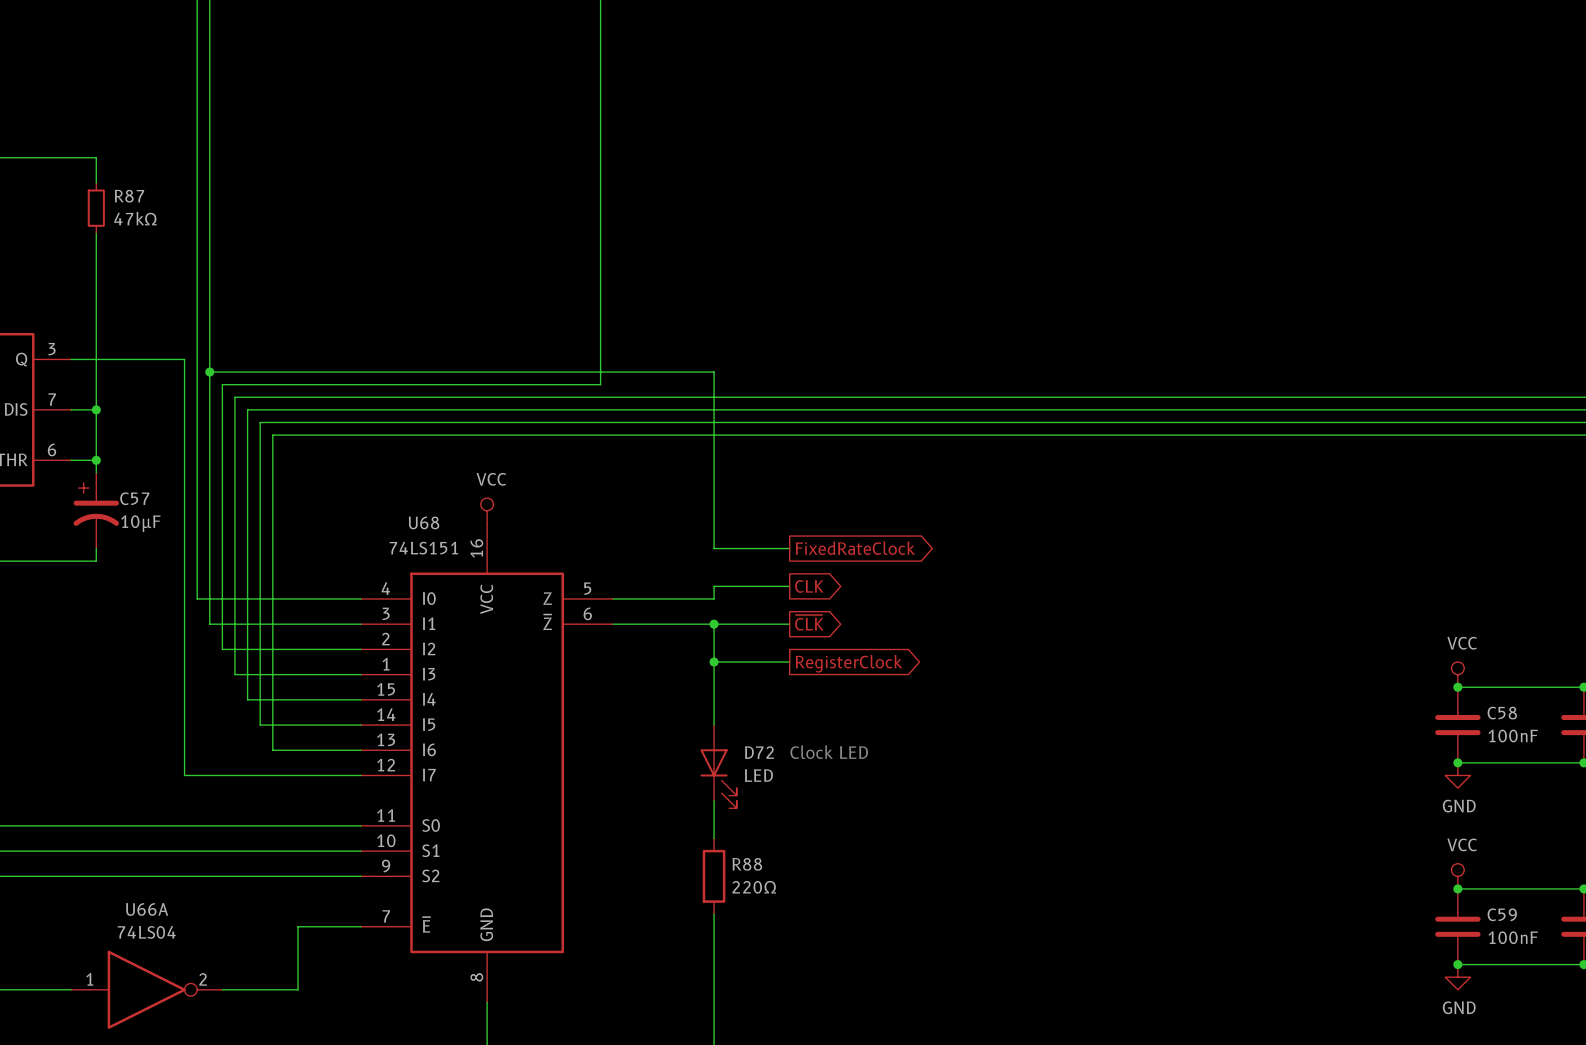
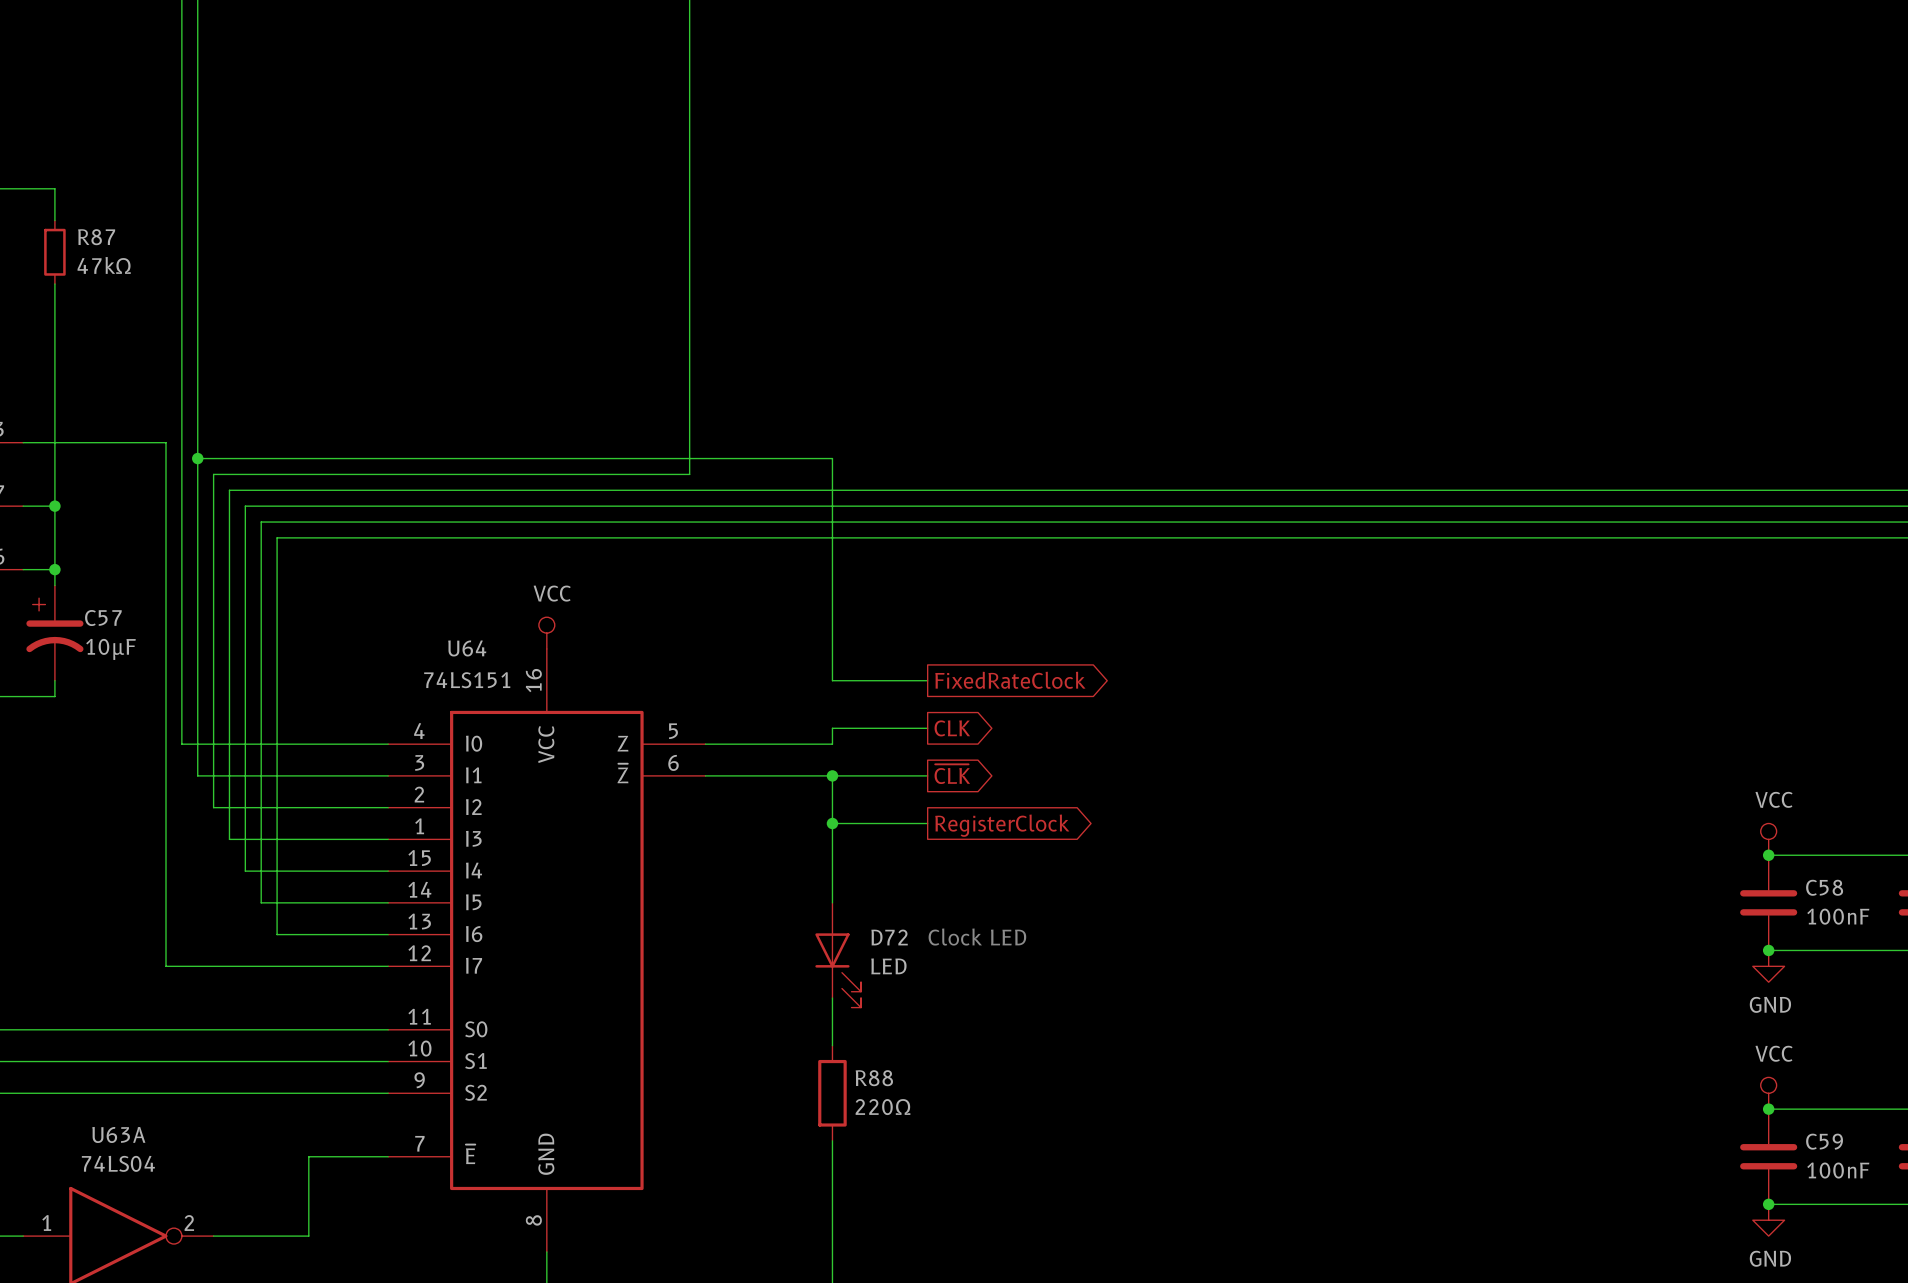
U68 name: U68 (424, 522) -> U64 (467, 648)
U66A name: U66A (147, 909) -> U63A (118, 1134)

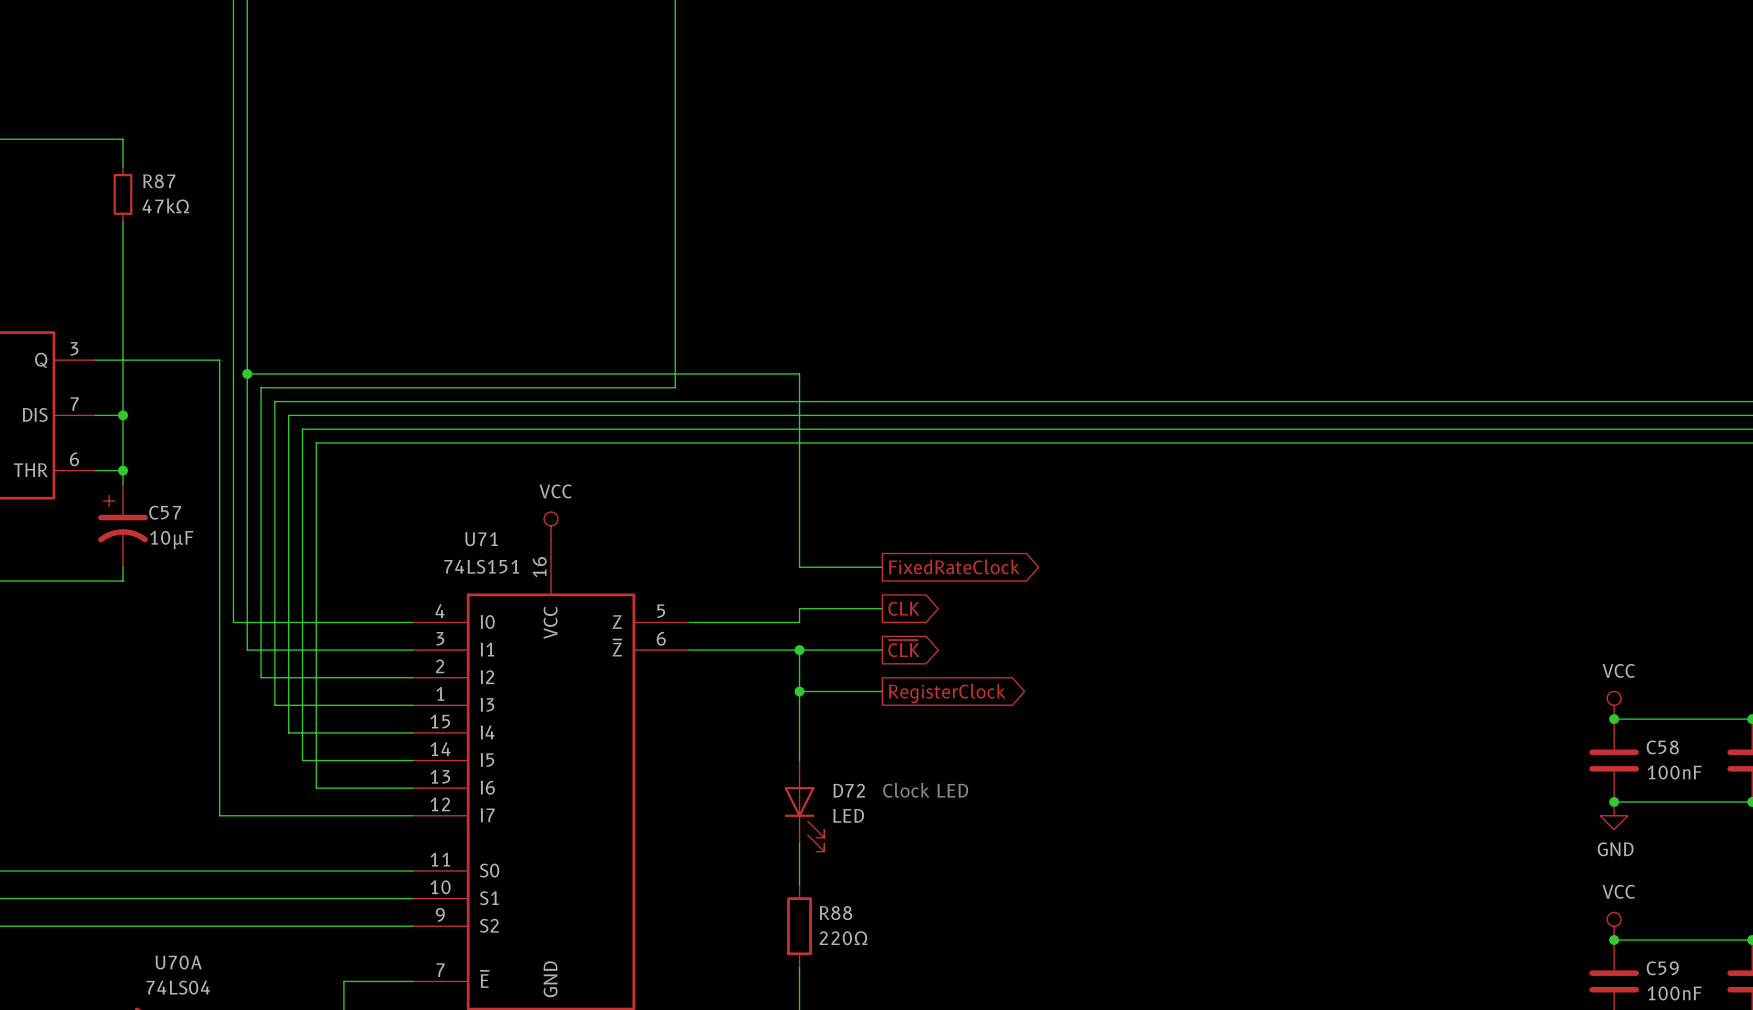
U64 name: U64 (467, 648) -> U71 (481, 539)
U63A name: U63A (118, 1134) -> U70A (178, 962)

